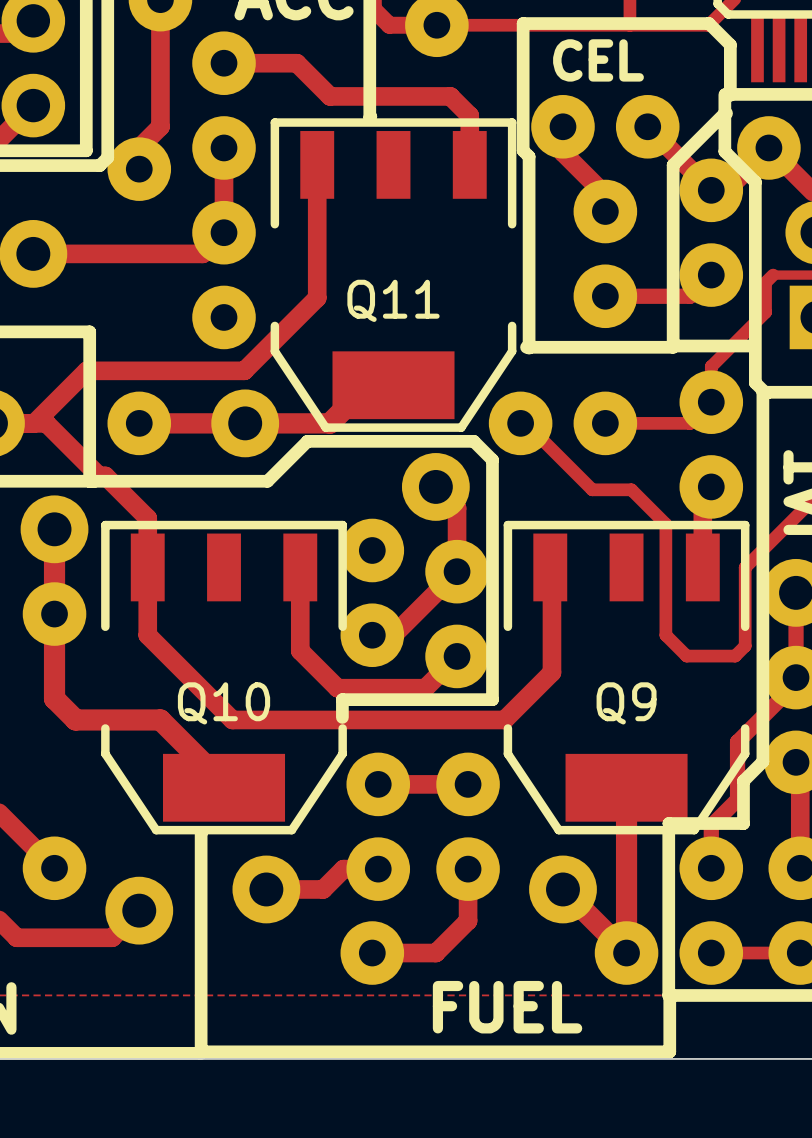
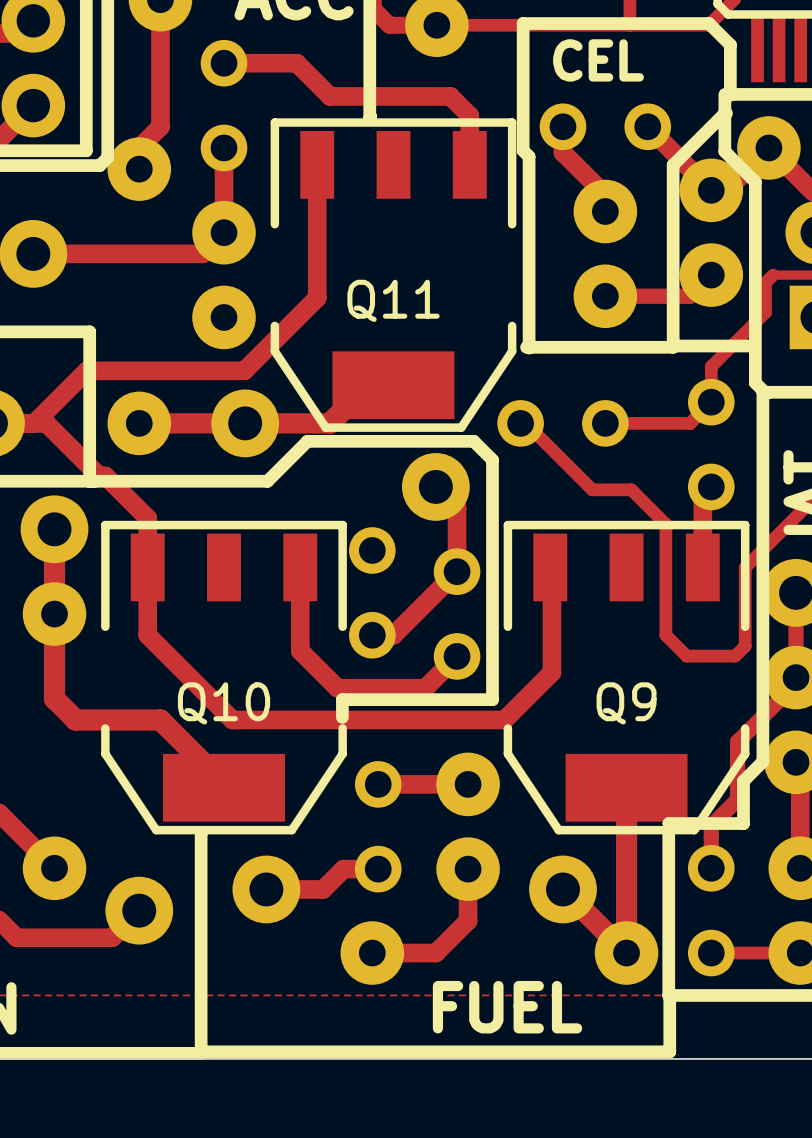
part footprint: [192, 31, 256, 180] -> [200, 39, 248, 172]
part footprint: [531, 94, 680, 159] -> [539, 103, 672, 151]
part footprint: [679, 370, 744, 519] -> [687, 378, 735, 511]
part footprint: [488, 391, 638, 456] -> [497, 400, 629, 447]
part footprint: [340, 518, 405, 668] -> [349, 527, 396, 659]
part footprint: [425, 539, 489, 689] -> [433, 548, 481, 680]
part footprint: [346, 752, 411, 901] -> [354, 761, 402, 893]
part footprint: [679, 836, 744, 985] -> [687, 844, 735, 977]

